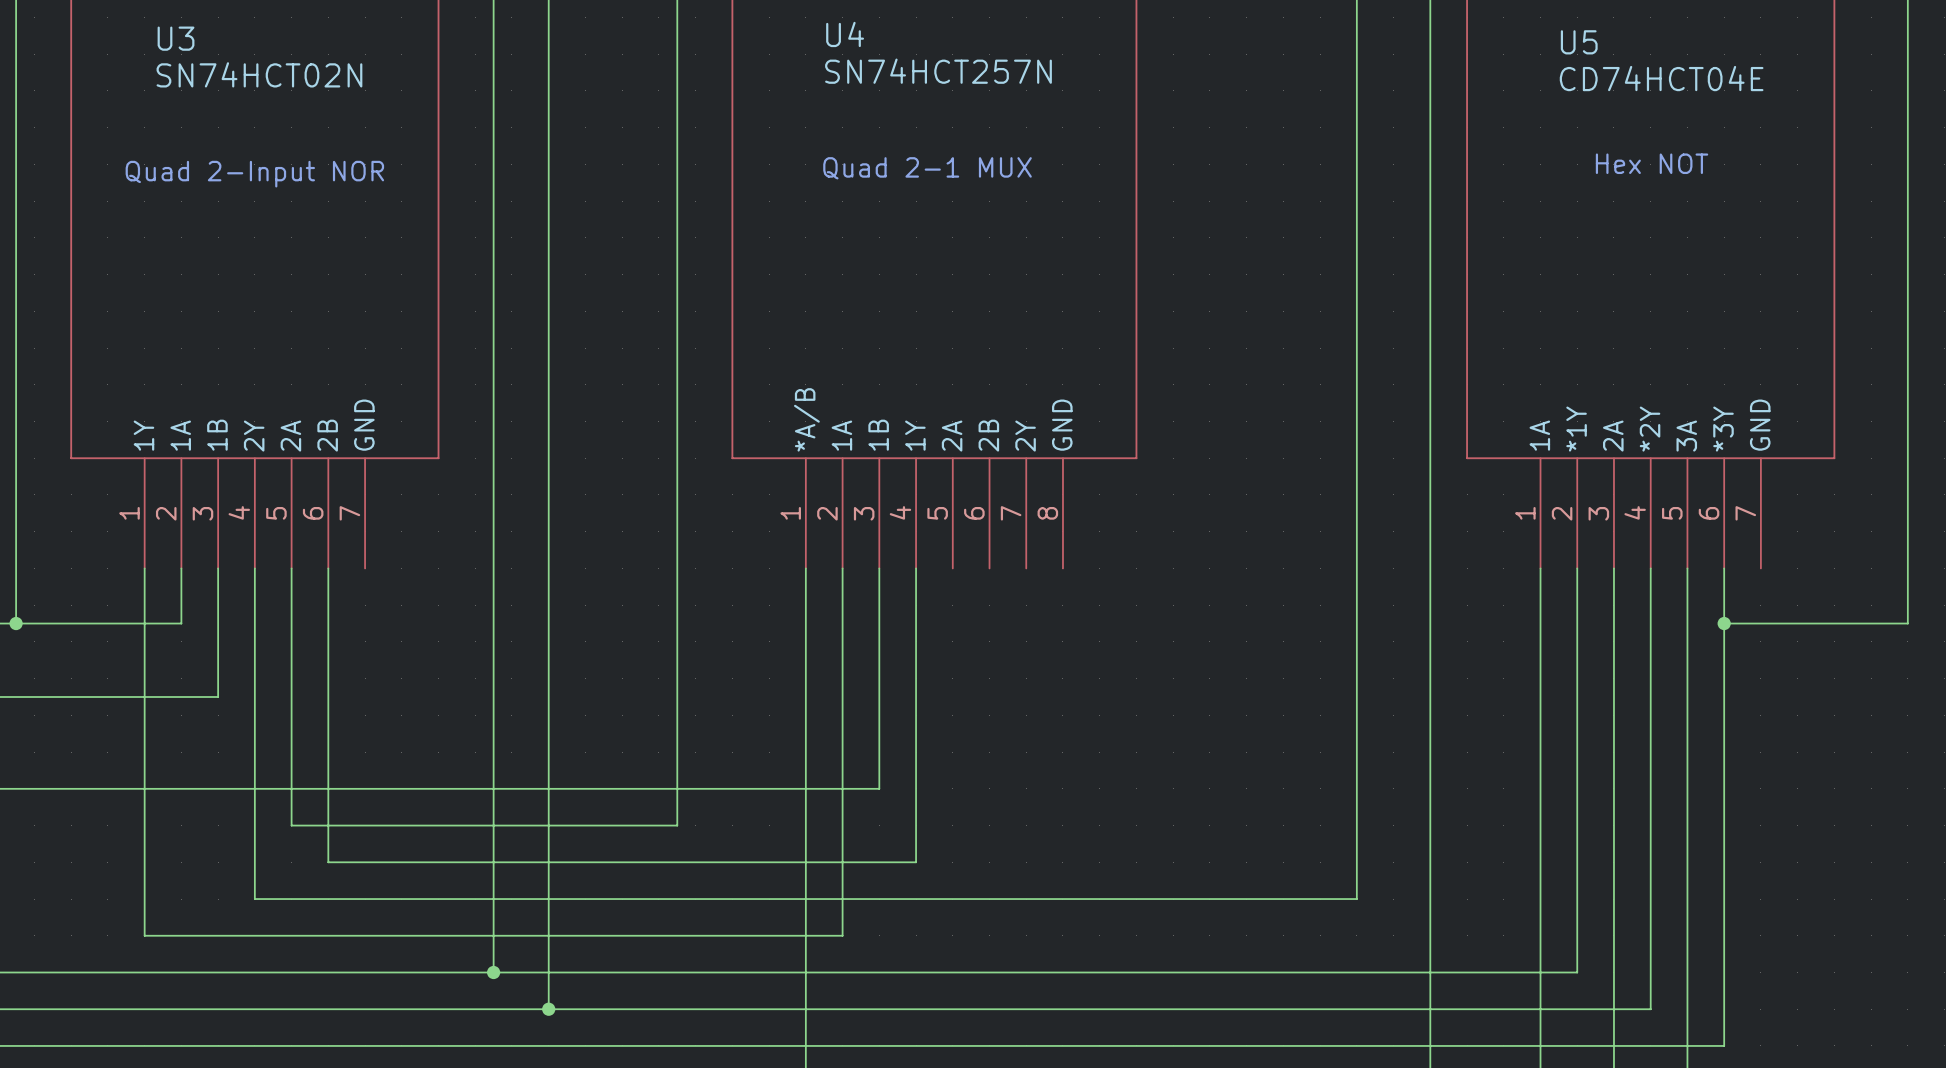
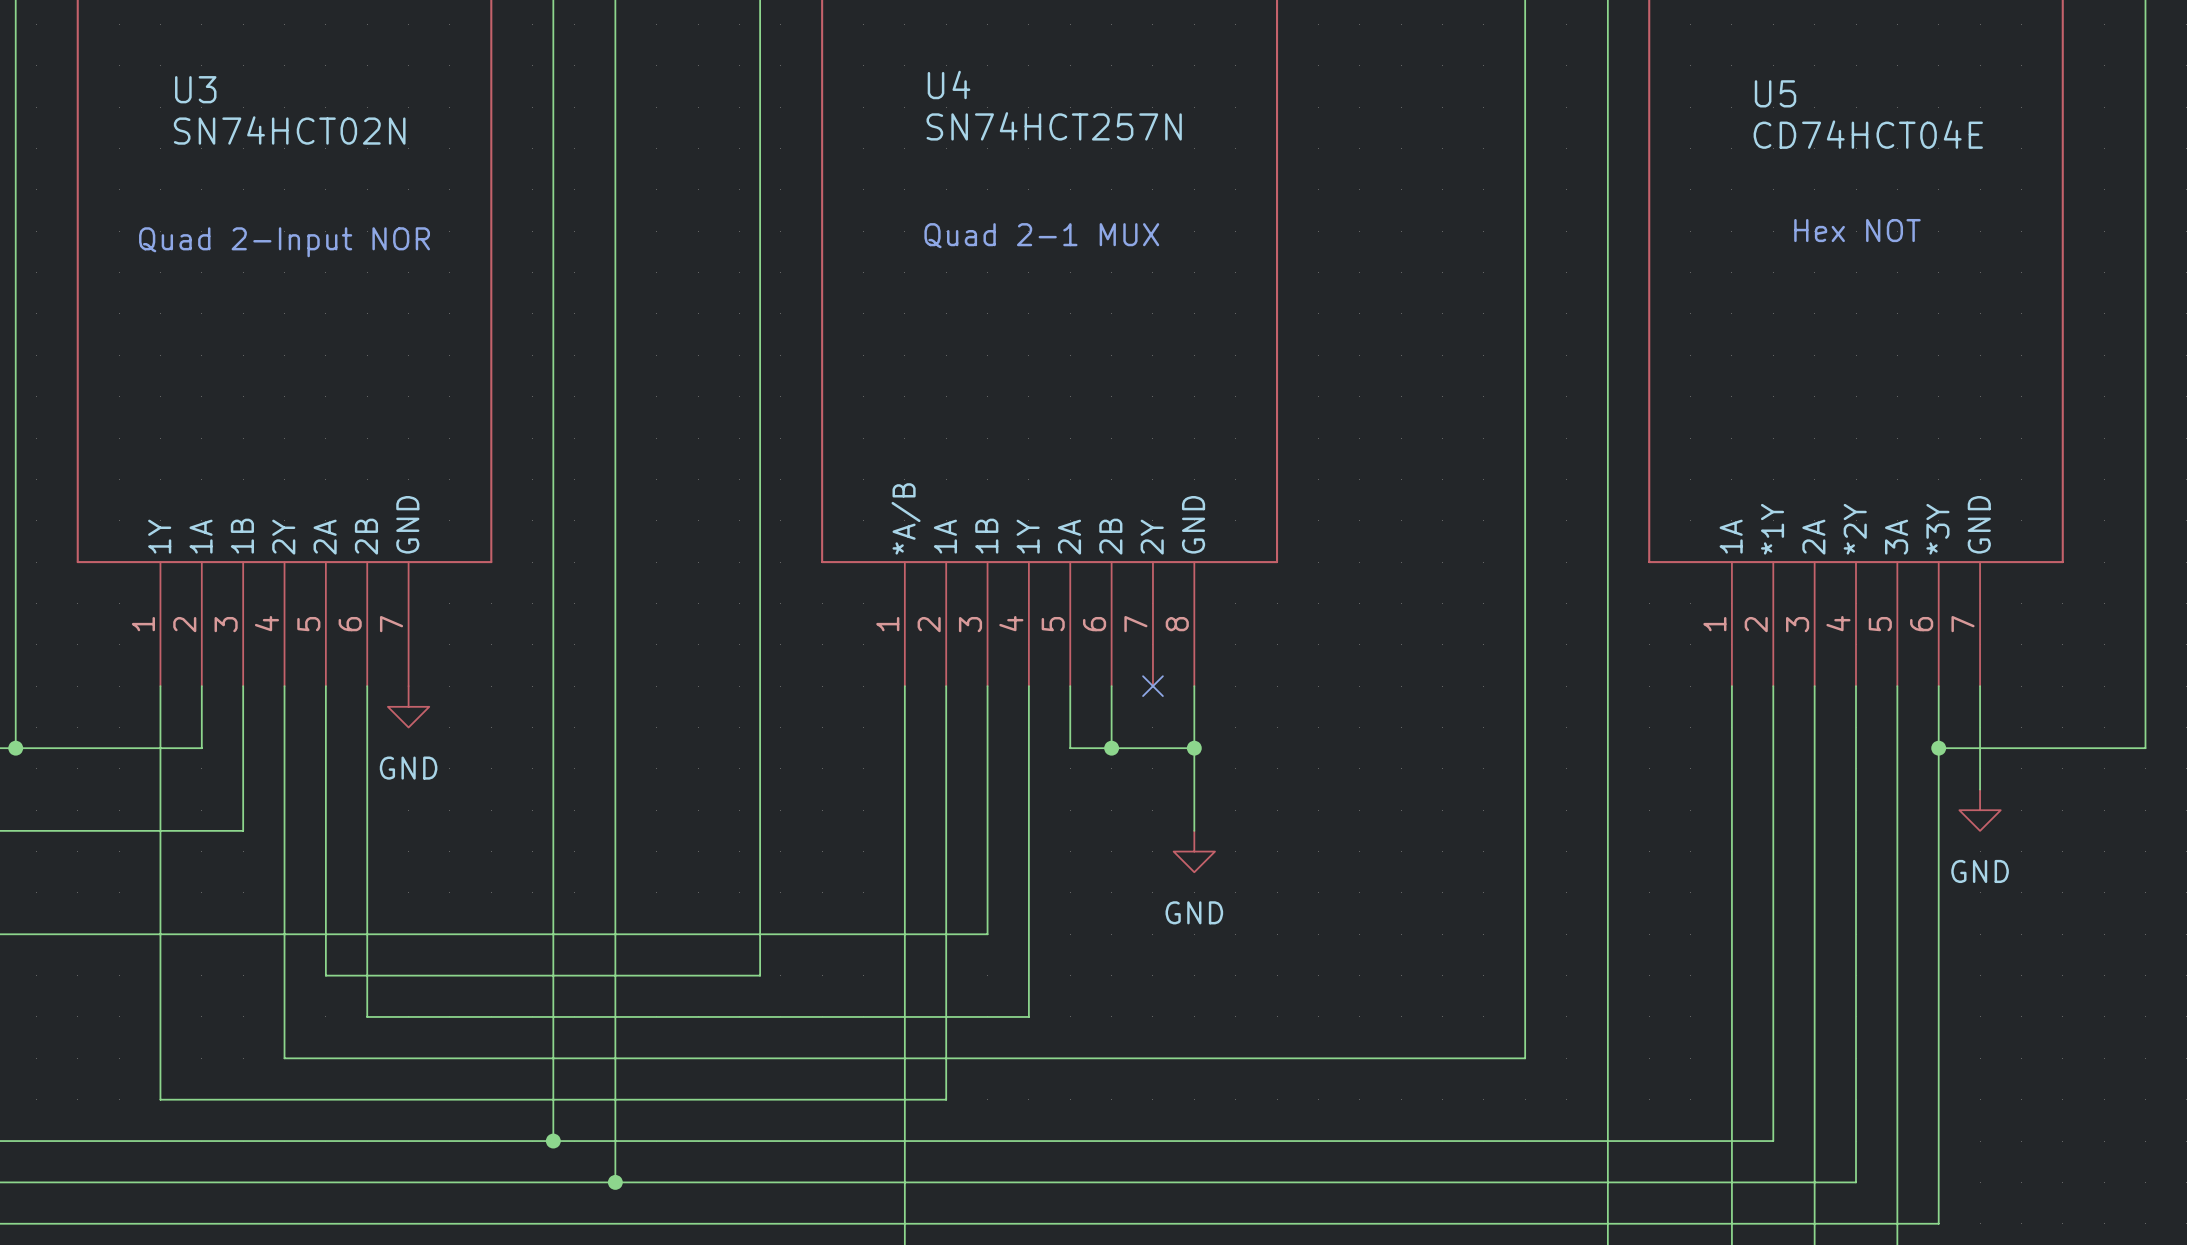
wire: none -> (1070, 686) (1070, 748) (1194, 748)
wire: none -> (1111, 686) (1111, 748)
no-connect mark: none -> (1152, 686)
wire: none -> (1194, 686) (1194, 830)
wire: none -> (1980, 686) (1980, 789)
power symbol: none -> GND (408, 706)
junction: none -> (1111, 748)
junction: none -> (1194, 748)
power symbol: none -> GND (1980, 810)
power symbol: none -> GND (1194, 851)

